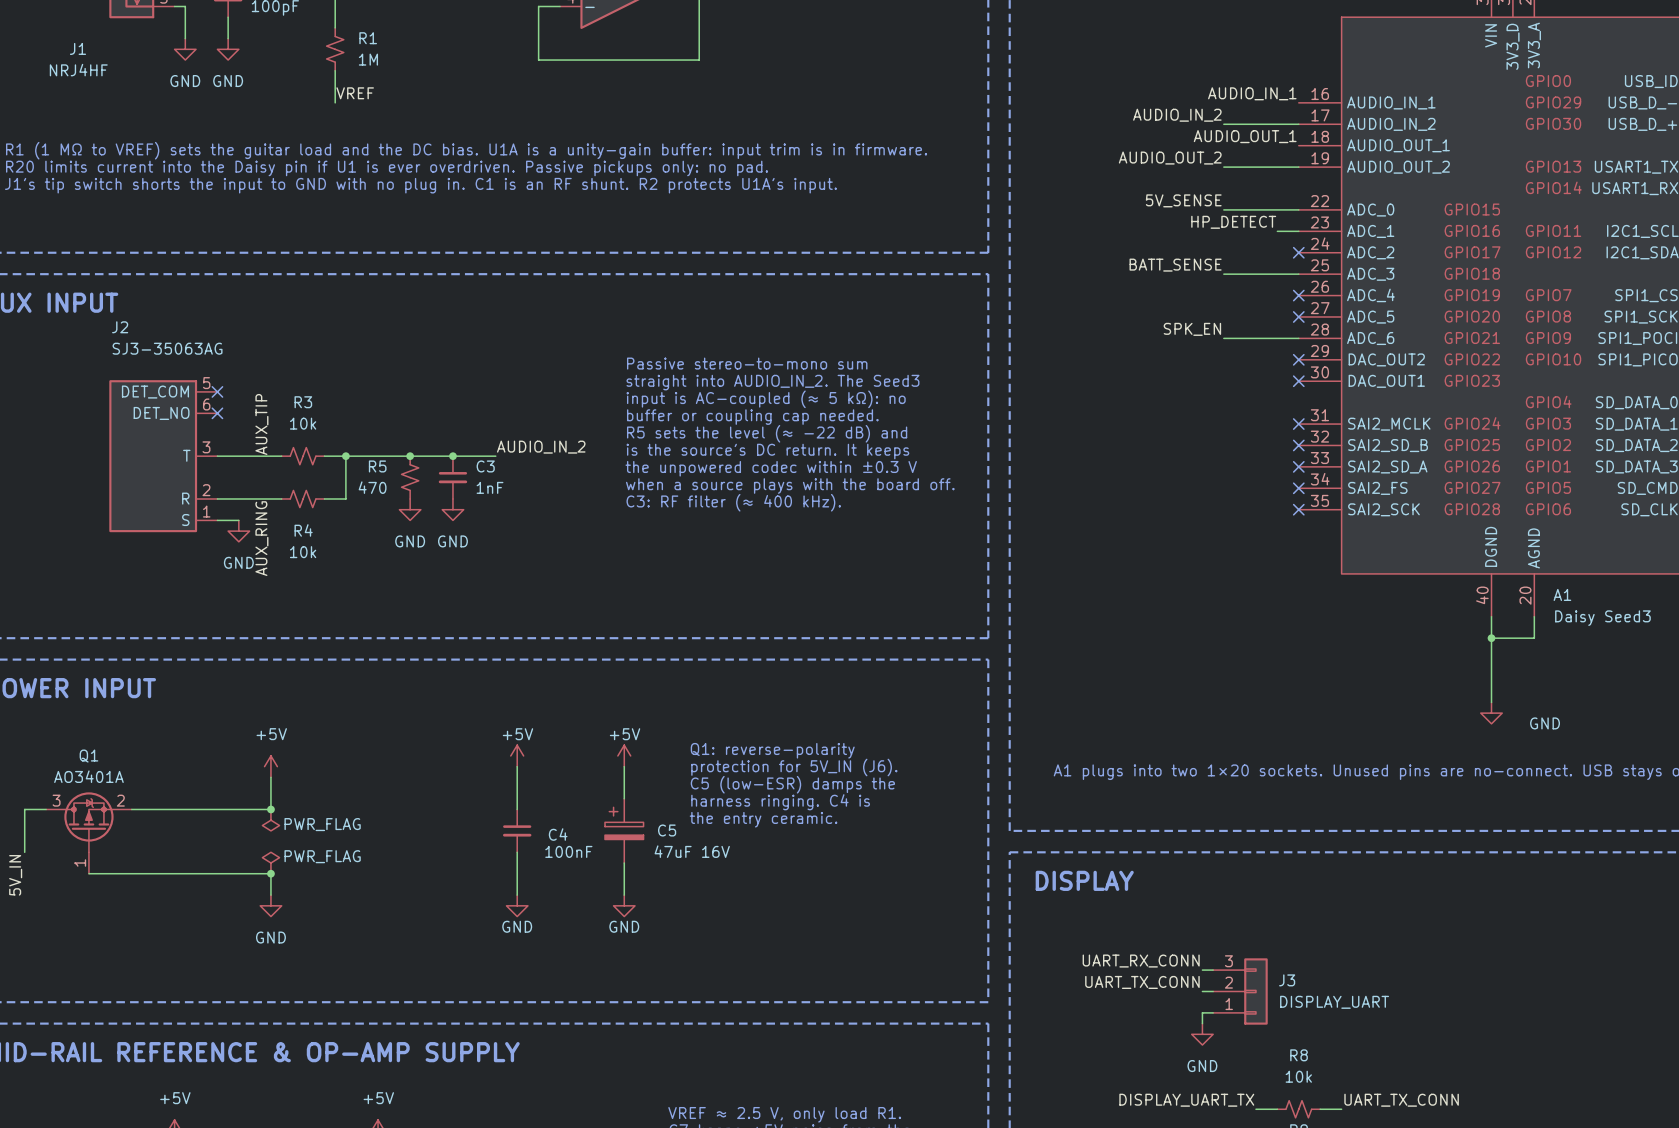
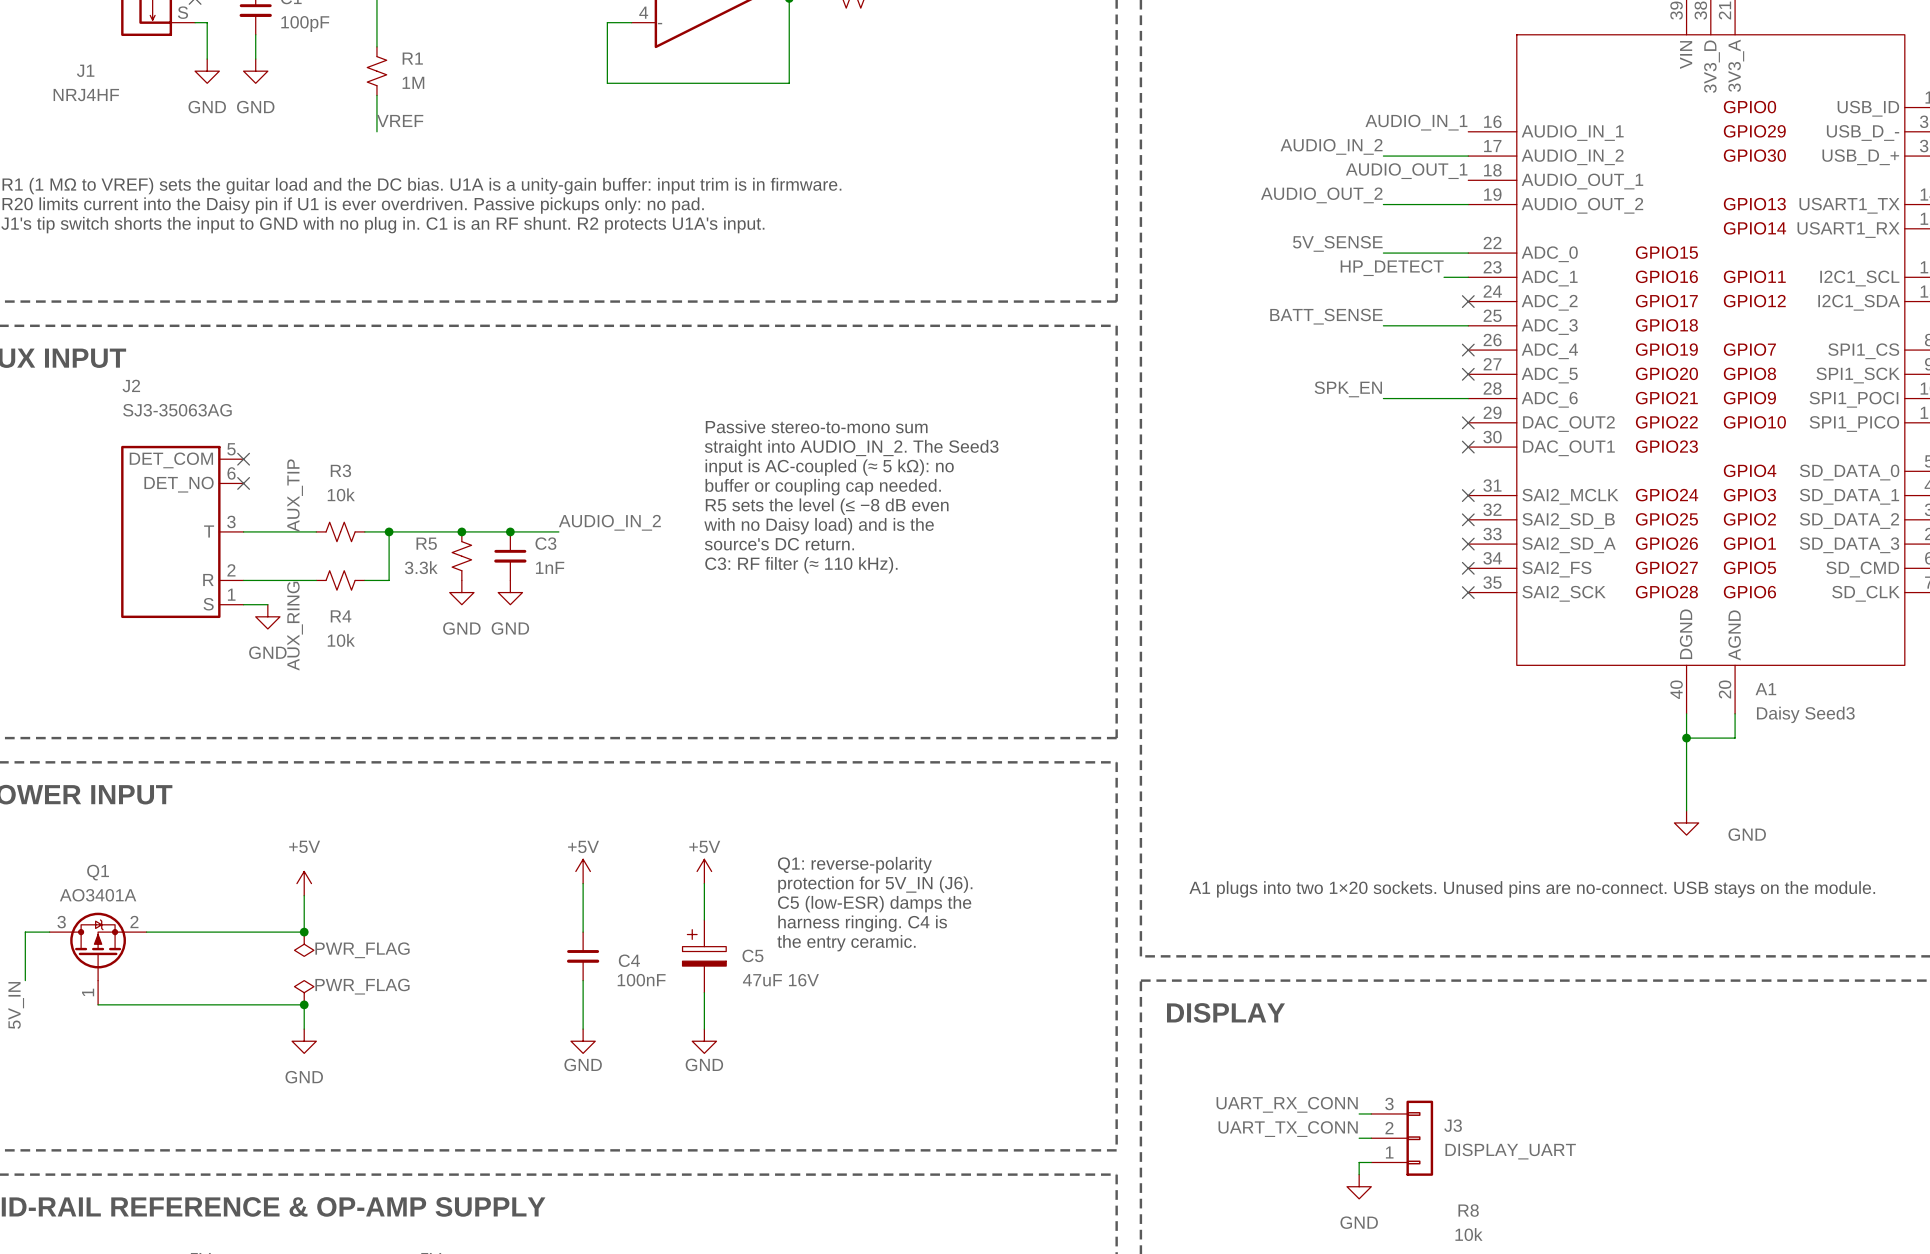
text: R5 sets the level (≈ −22 dB) and (767, 433) -> R5 sets the level (≤ −8 dB even (827, 506)
text: is the source's DC return. It keeps (767, 451) -> with no Daisy load) and is the (819, 526)
text: the unpowered codec within ±0.3 V (771, 468) -> source's DC return. (779, 544)
text: when a source plays with the board off. (790, 486) -> C3: RF filter (≈ 110 kHz). (801, 565)
R5 value: 470 (372, 487) -> 3.3k (421, 567)
text: C3: RF filter (≈ 400 kHz). (733, 502) -> none

